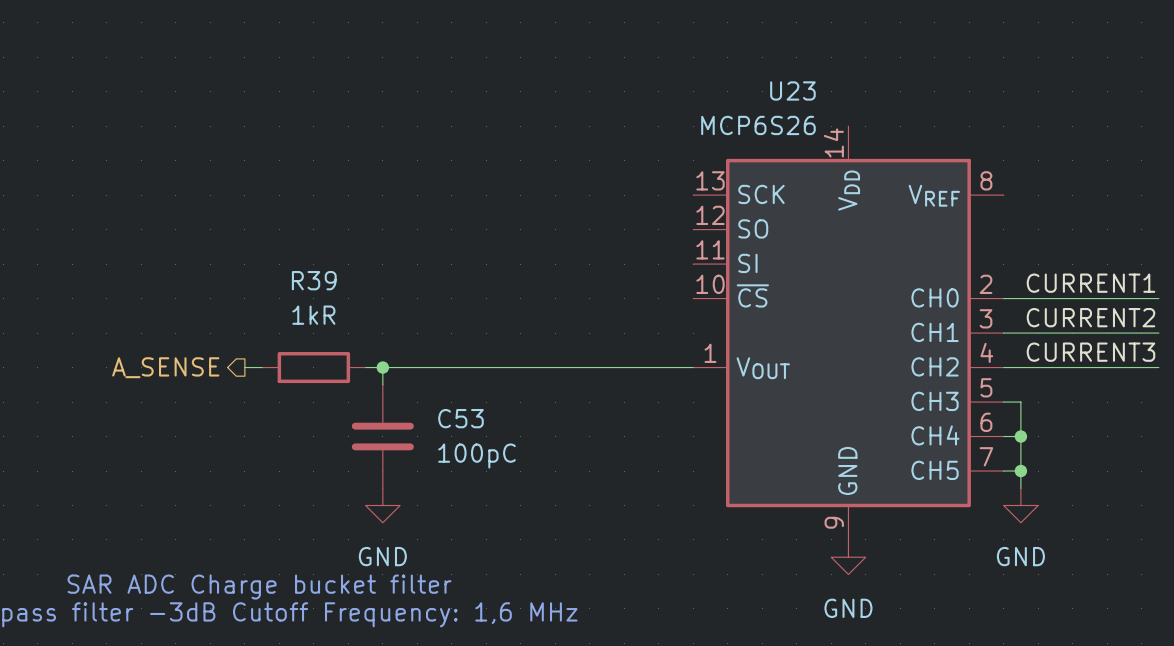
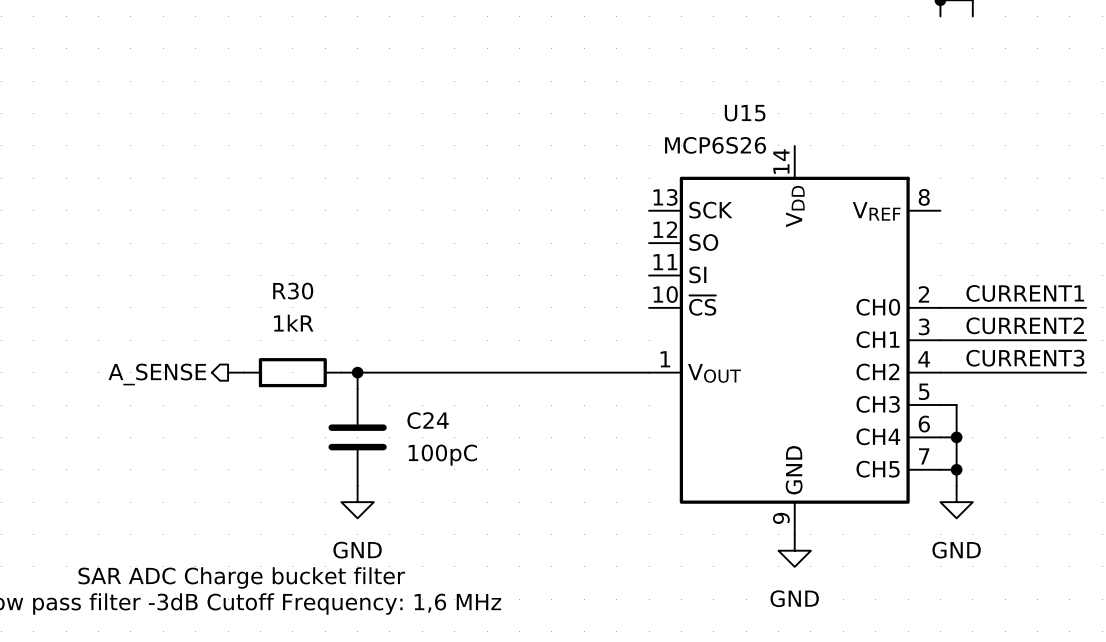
U23 name: U23 (792, 90) -> U15 (745, 113)
R39 name: R39 (314, 280) -> R30 (293, 291)
C53 name: C53 (460, 418) -> C24 (428, 420)

